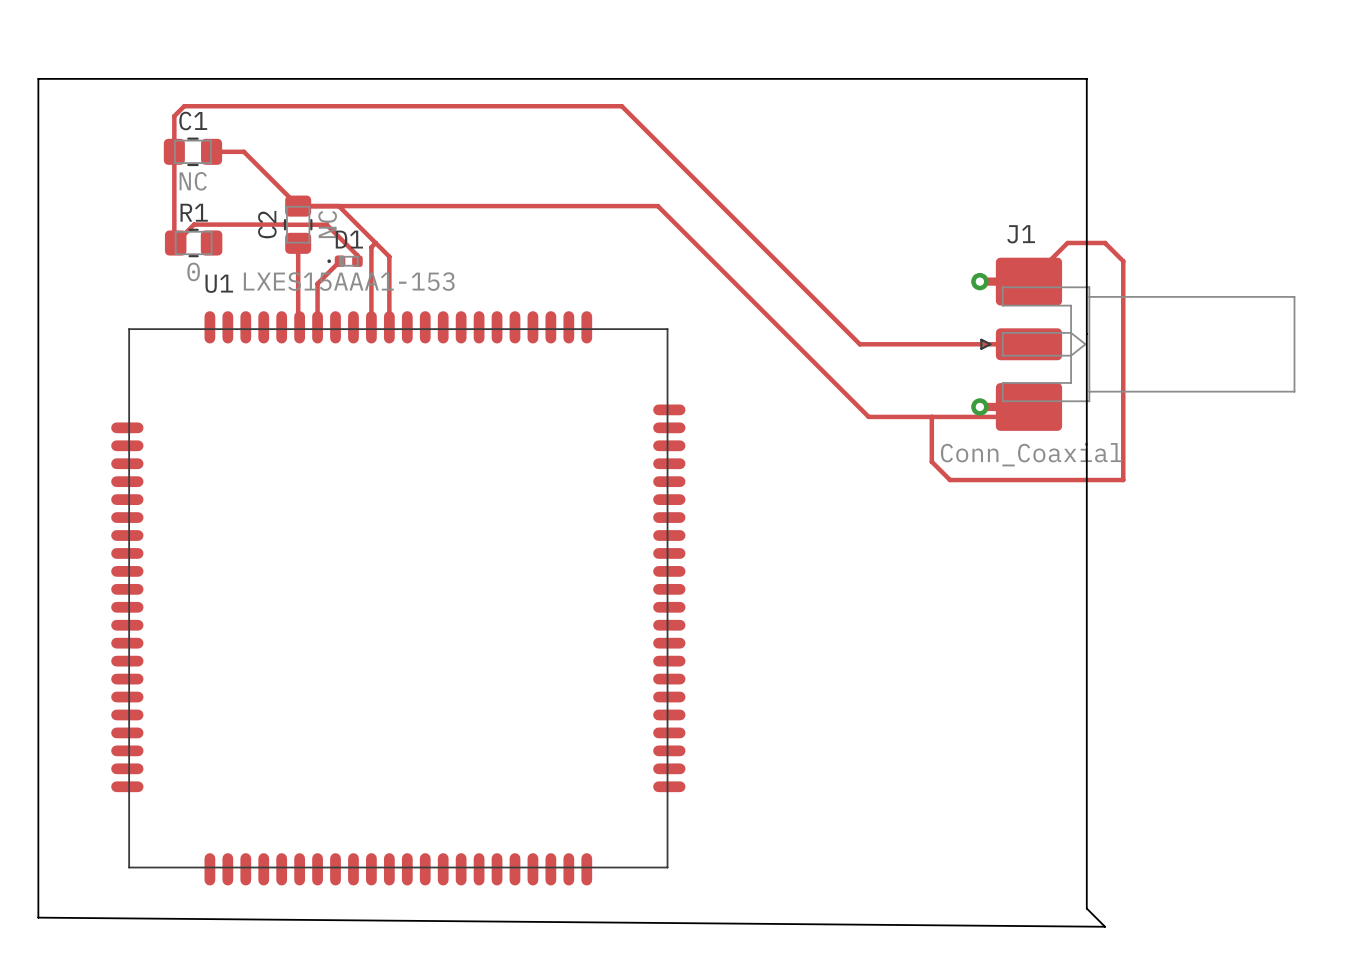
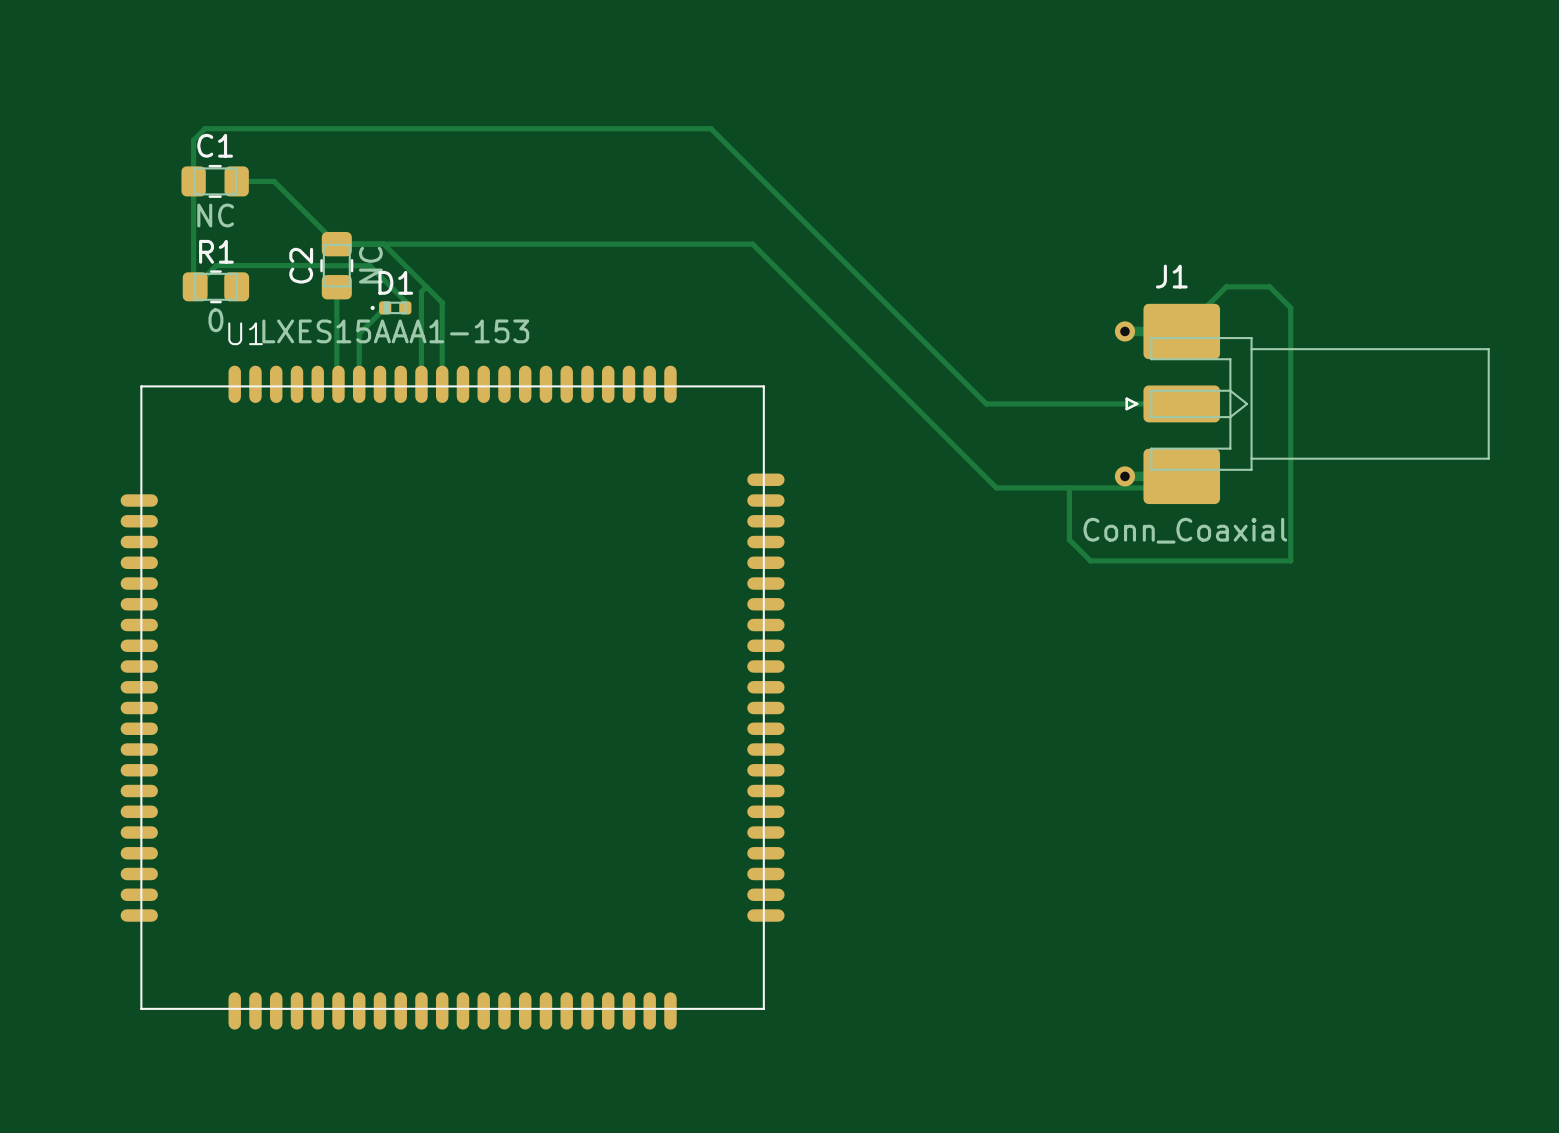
board edge: (38, 78) (1086, 78) (1086, 908) (1105, 926) (38, 917) (38, 78) -> none

